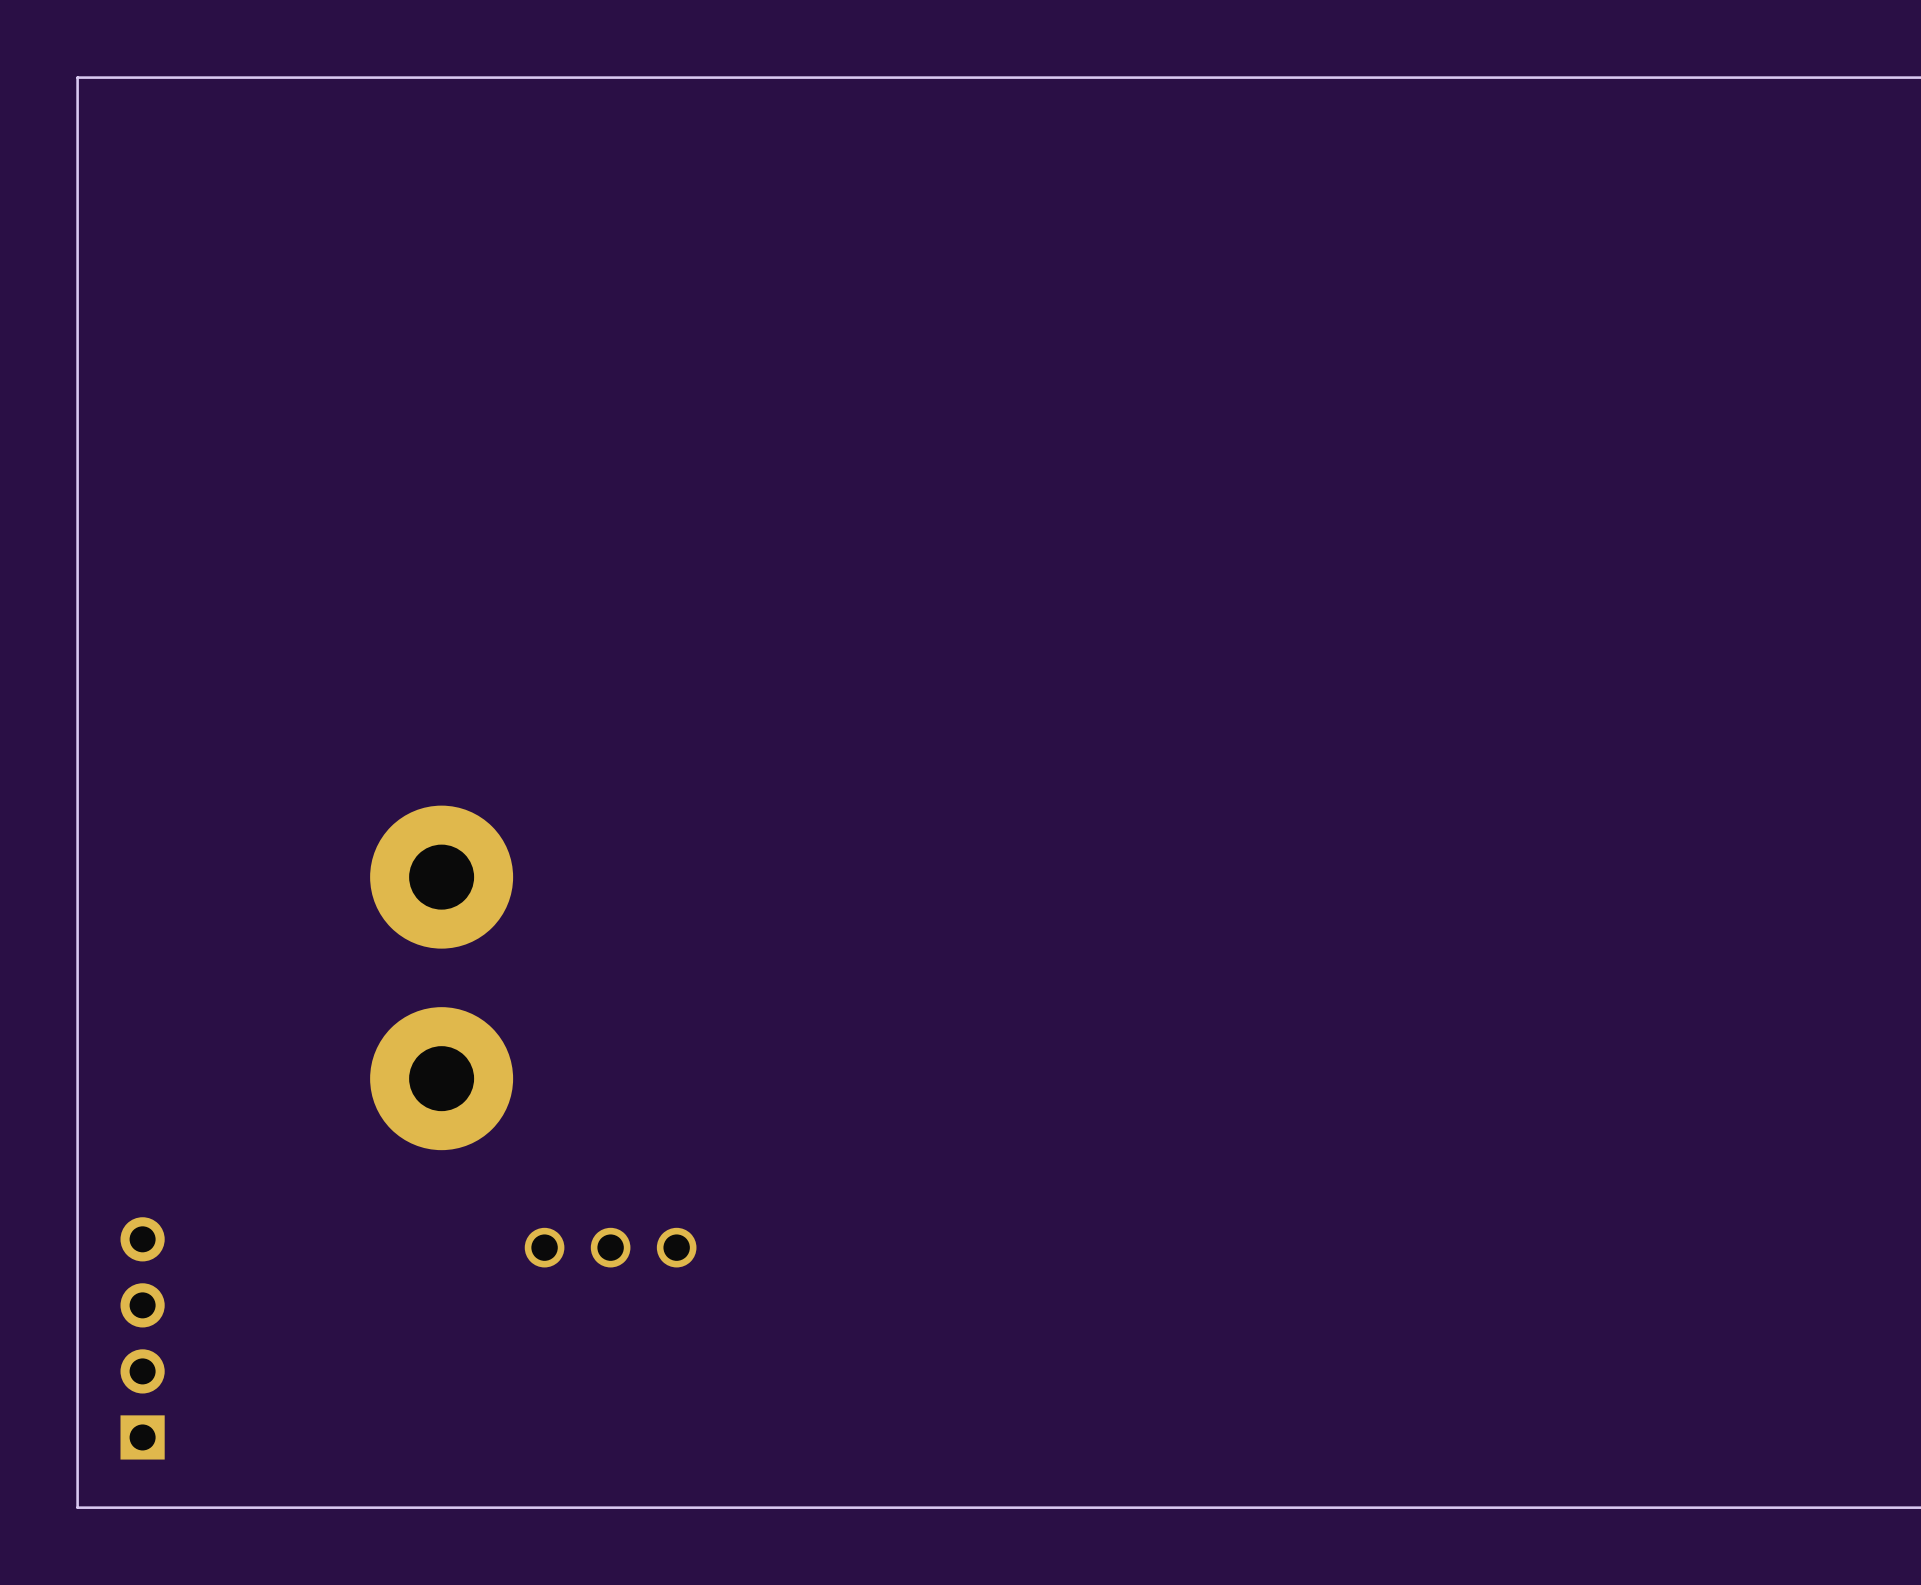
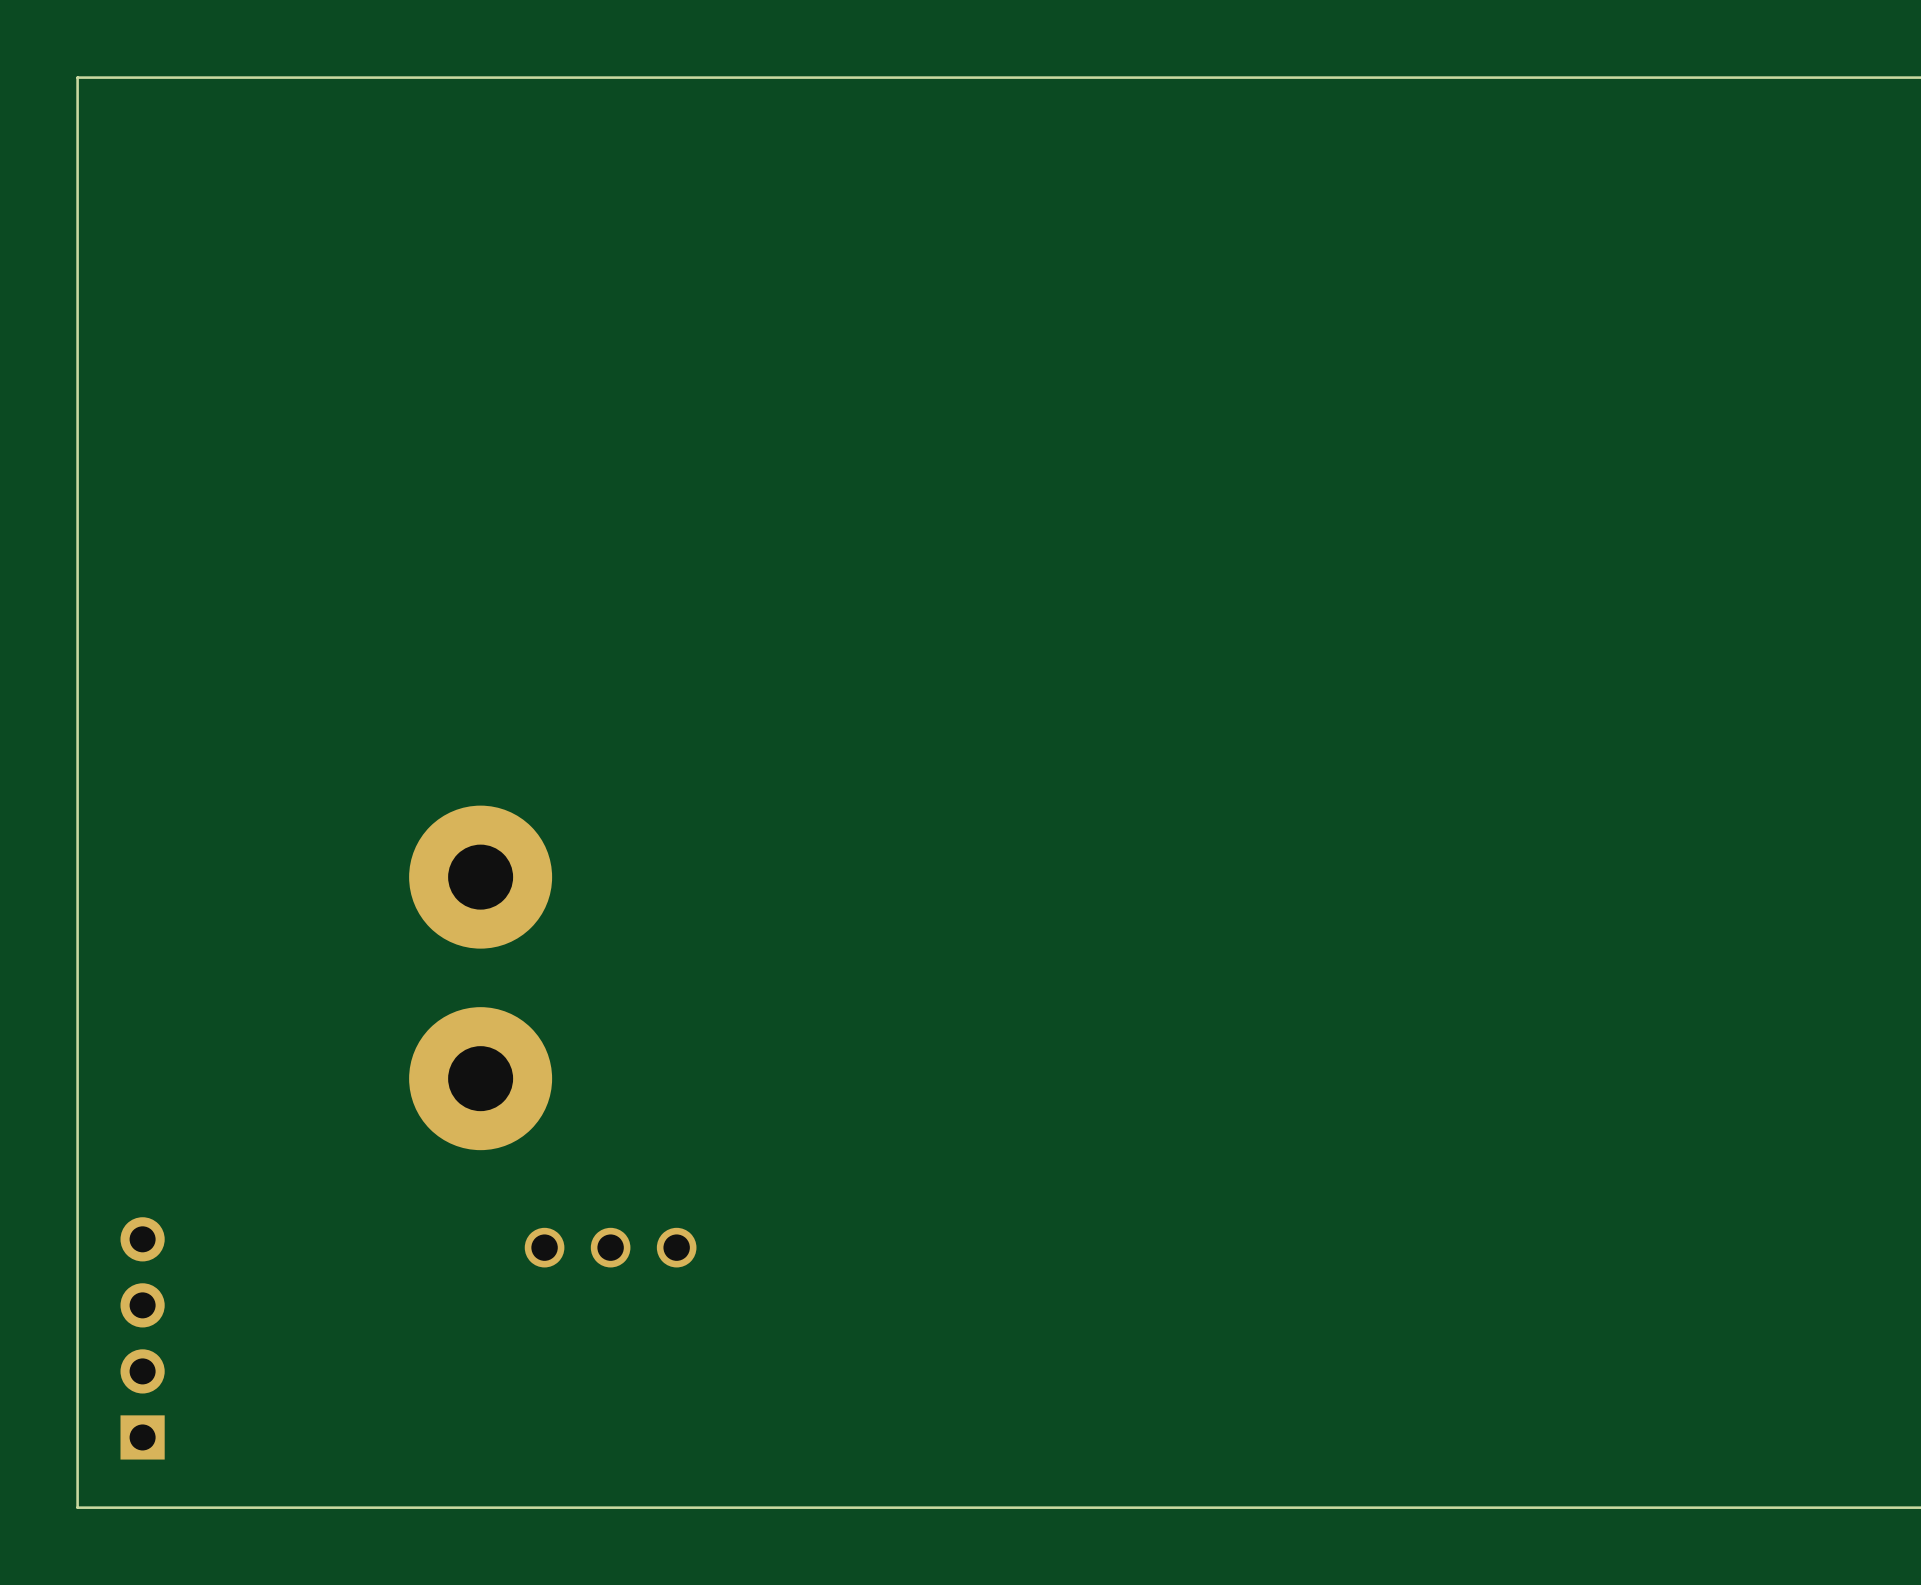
part position: (441, 877) -> (480, 877)
part position: (441, 1078) -> (480, 1078)

